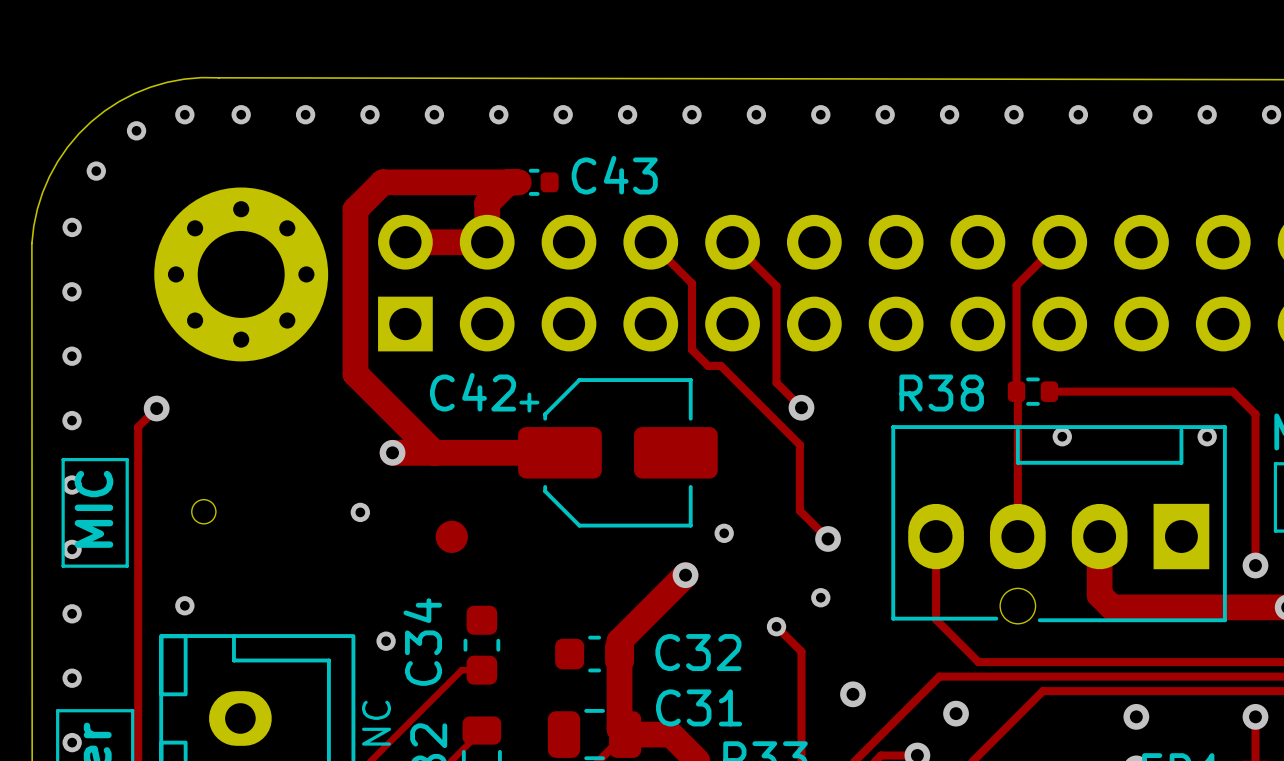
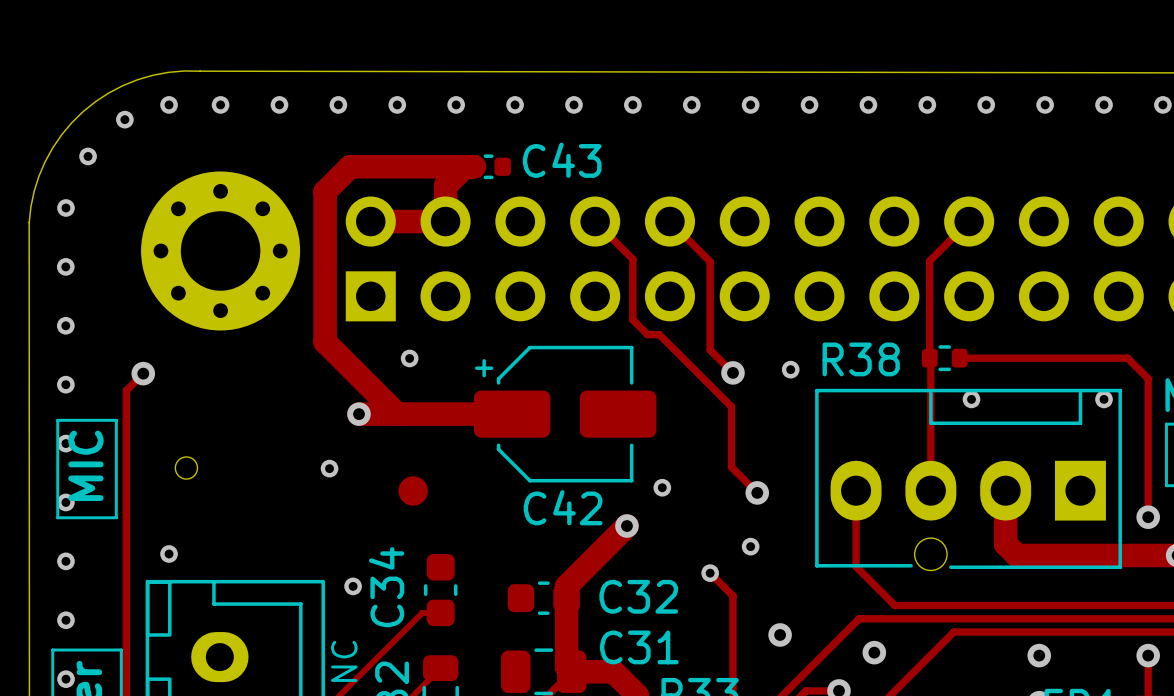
via: none -> (409, 358)
C42 name position: C42 (473, 392) -> C42 (563, 507)
via: none -> (790, 369)

